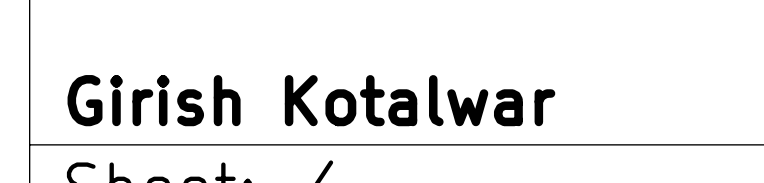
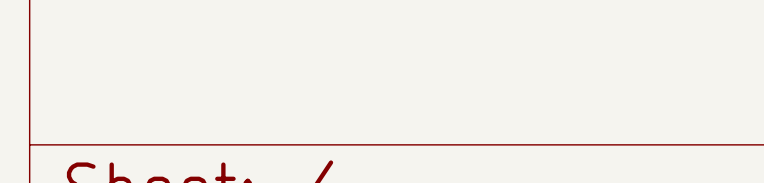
title block: Girish Kotalwar (311, 100) -> none

